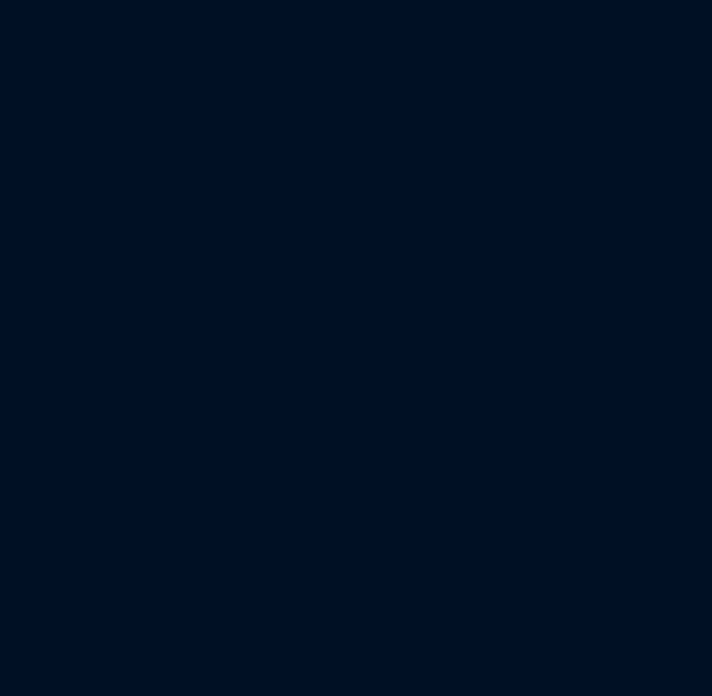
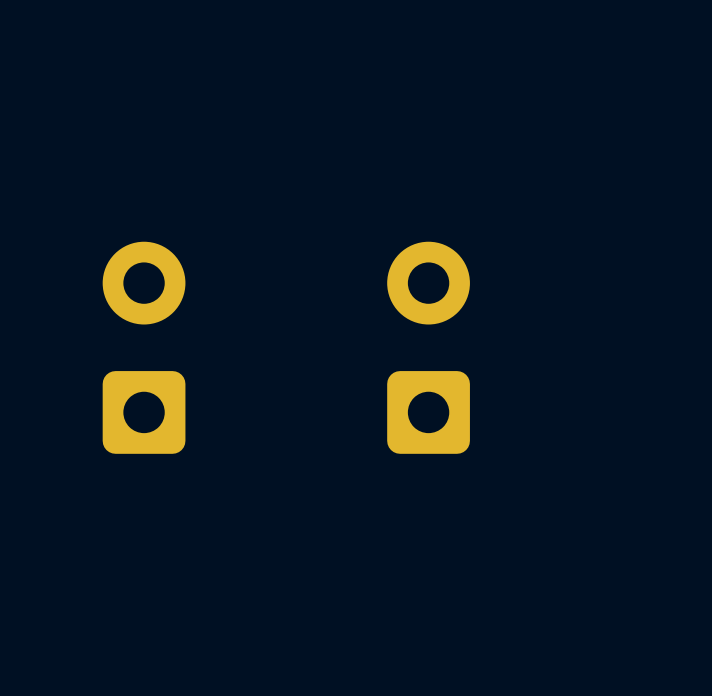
part: none -> (144, 347)
part: none -> (428, 347)

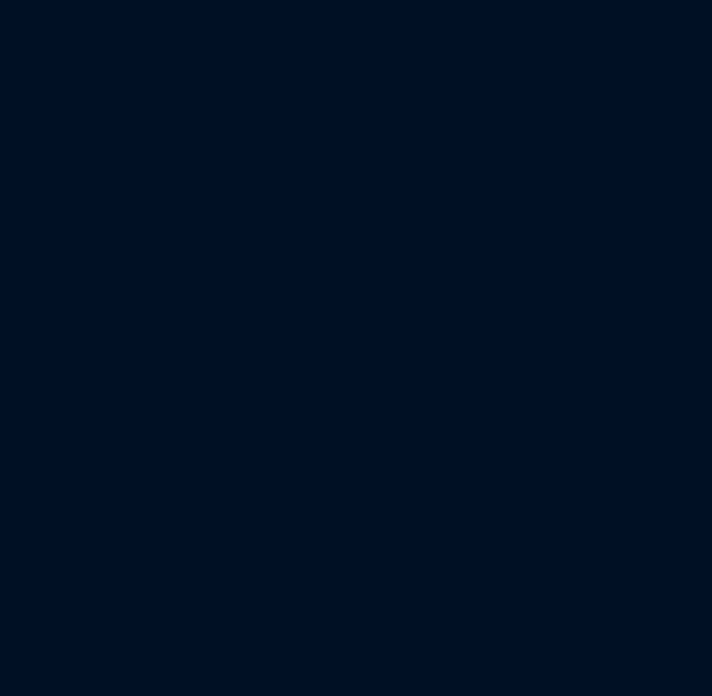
part: (144, 347) -> none
part: (428, 347) -> none

